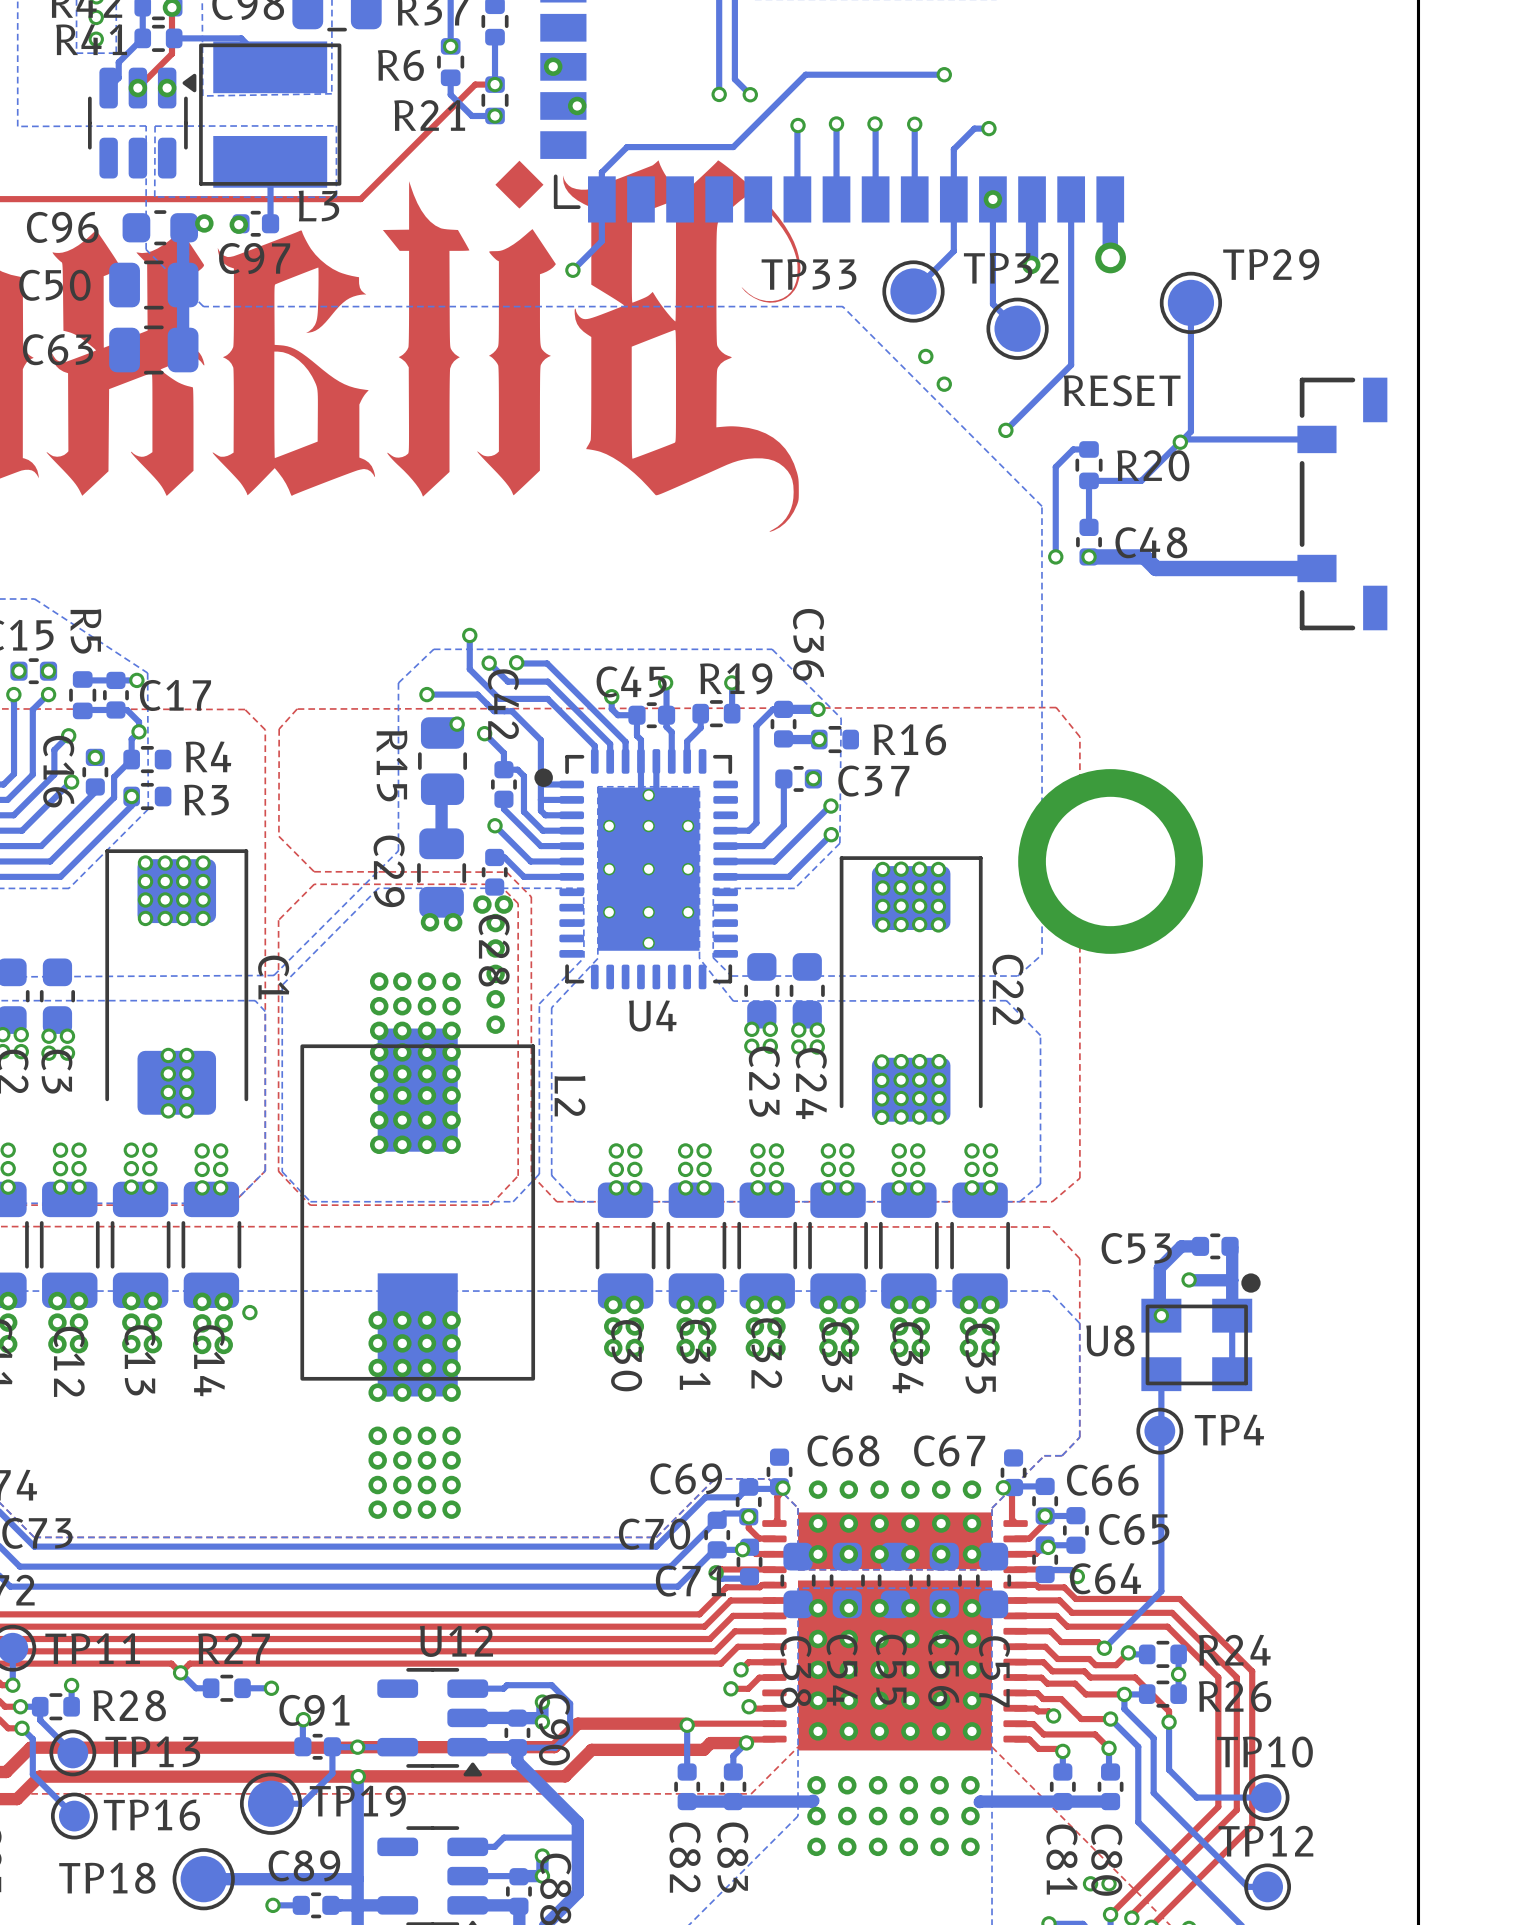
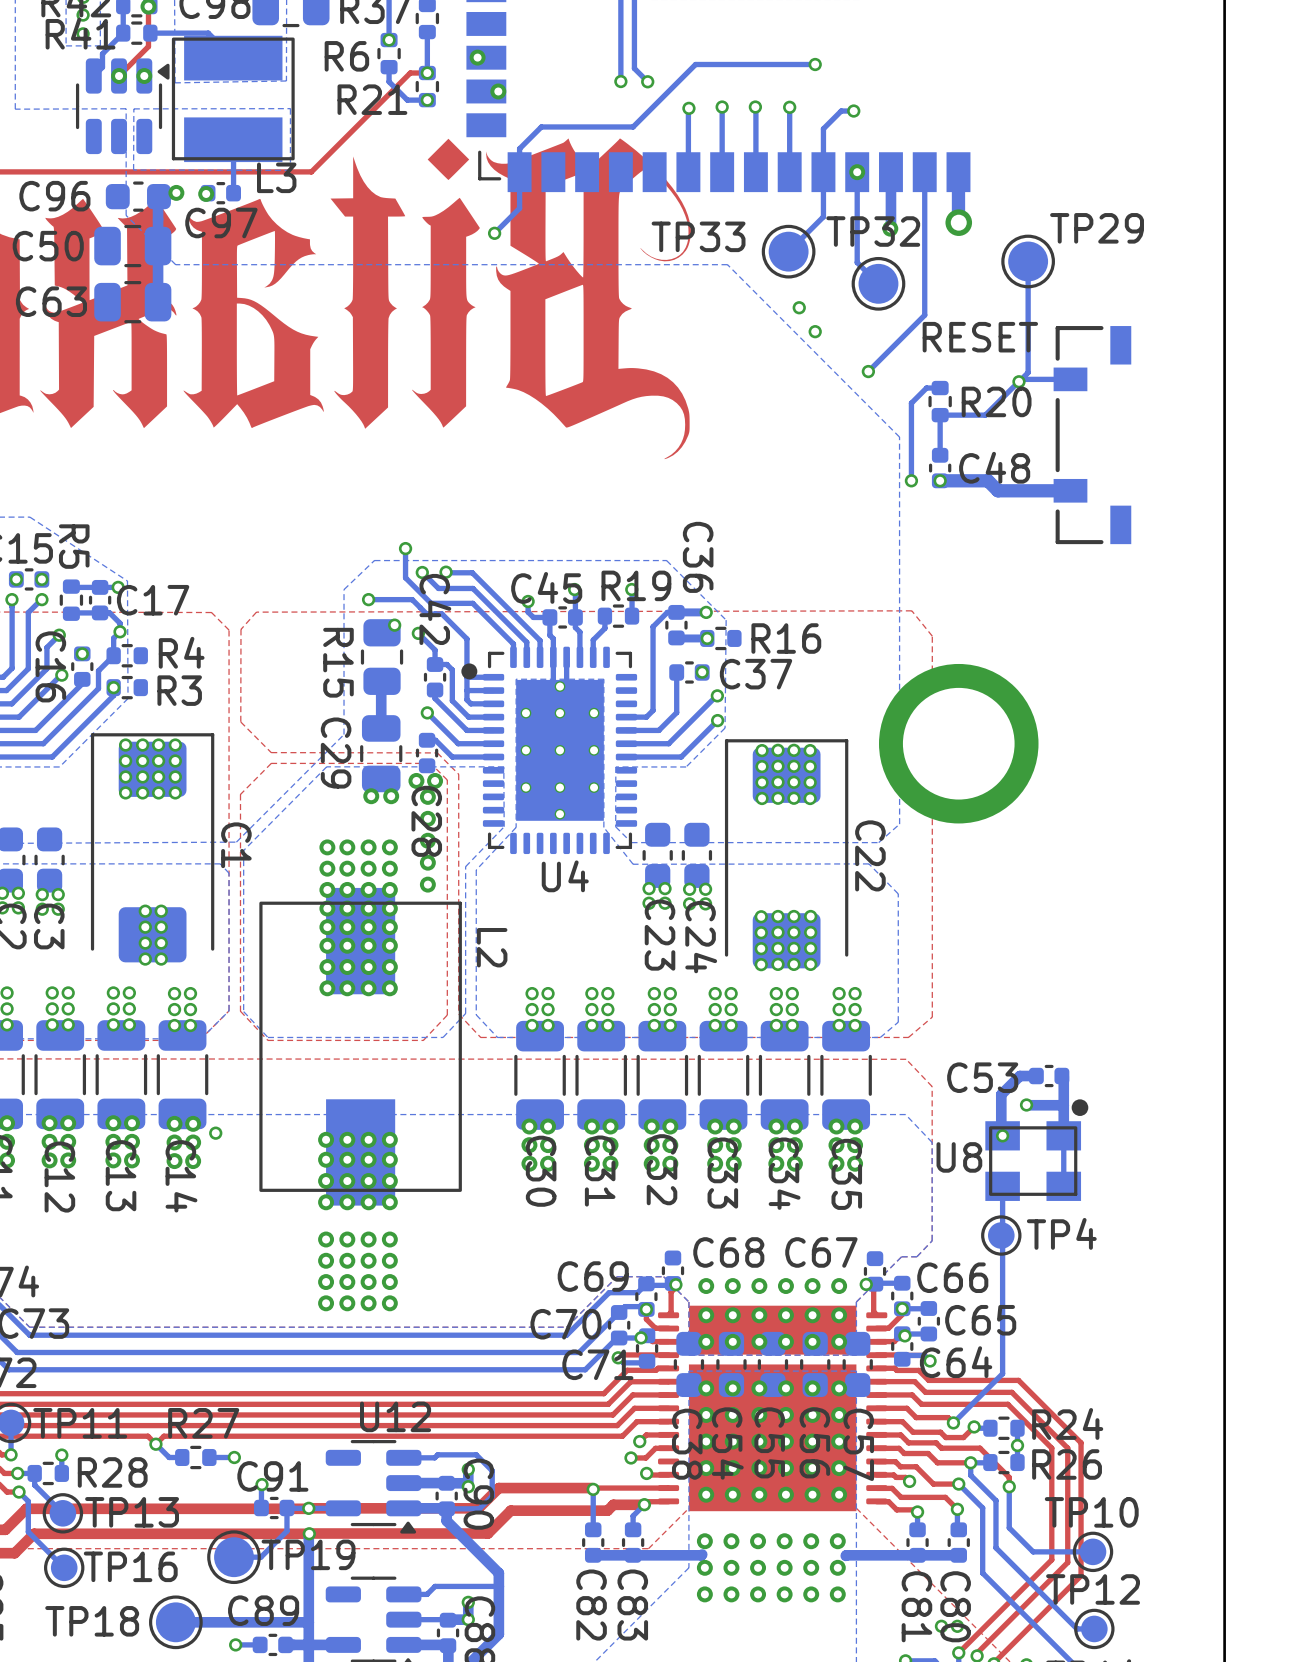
bottom track: (1316, 439) (1239, 439) -> none
part position: (1342, 503) -> (1092, 435)
bottom track: (1316, 568) (1239, 568) -> none

